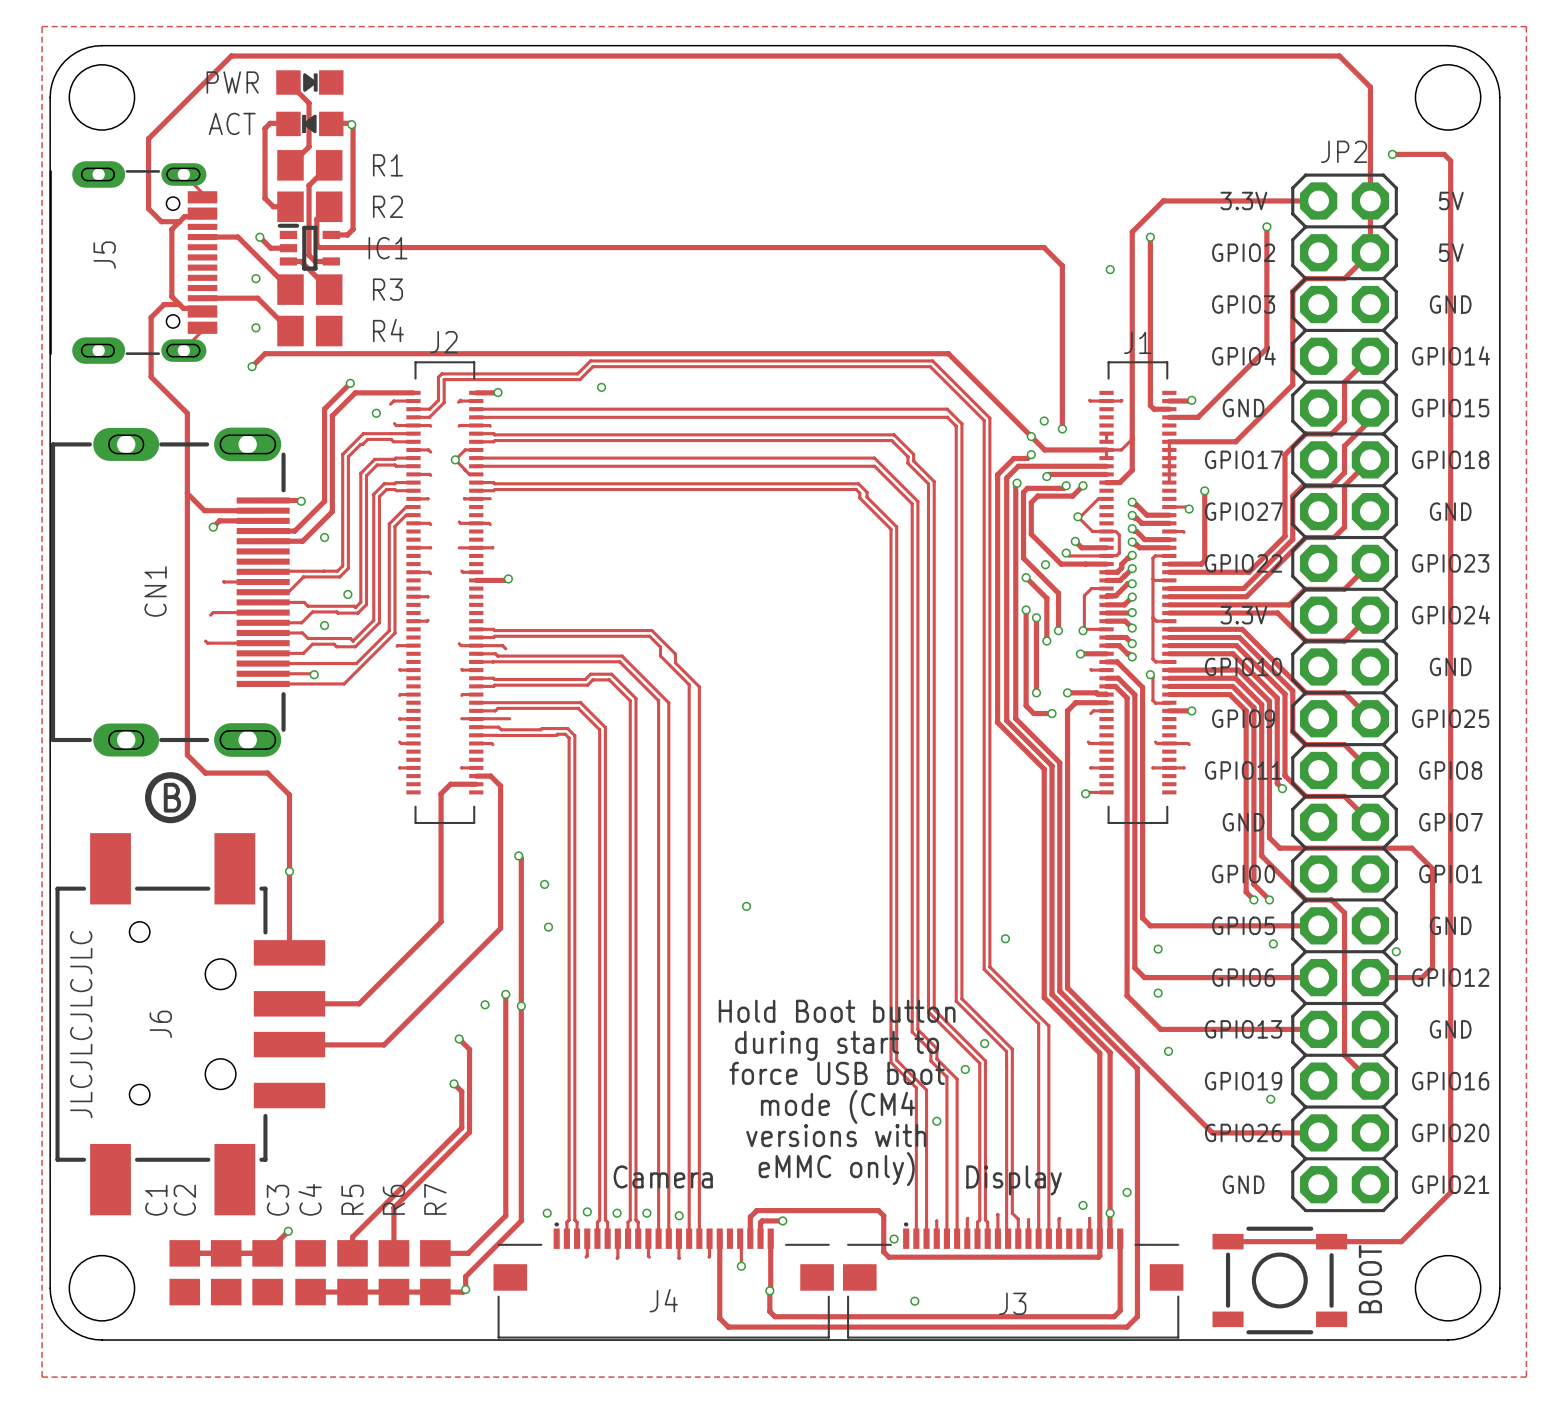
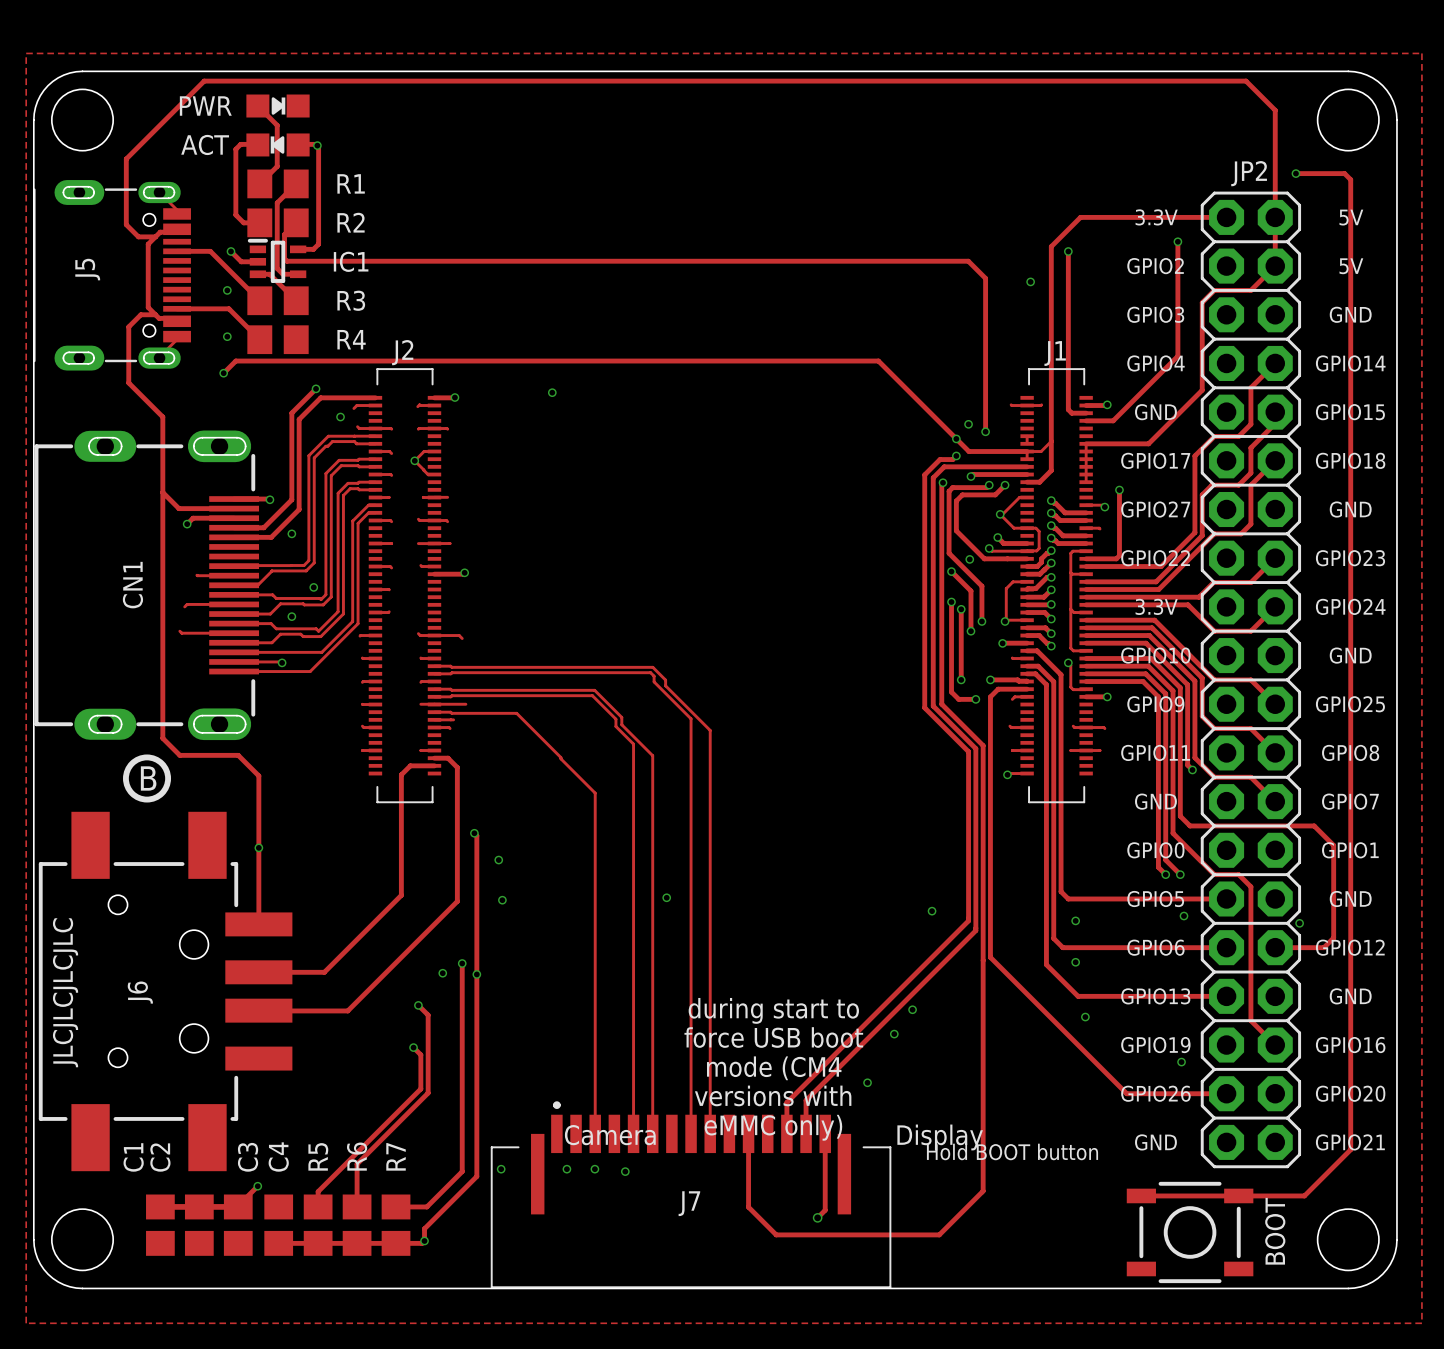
track: (413, 409) (429, 409) (438, 400) (438, 377) (441, 373) (577, 373) (590, 360) (932, 360) (989, 418) (989, 966) (1048, 1025) (1048, 1238) -> none
track: (476, 409) (947, 409) (961, 423) (961, 998) (1012, 1049) (1012, 1213) (1018, 1219) (1018, 1238) -> none
track: (413, 417) (429, 417) (444, 402) (444, 379) (579, 379) (592, 366) (930, 366) (984, 420) (984, 969) (1038, 1023) (1038, 1238) -> none
track: (476, 417) (947, 417) (956, 426) (956, 1001) (1006, 1051) (1008, 1238) -> none
track: (476, 433) (894, 434) (913, 454) (913, 461) (934, 481) (934, 1009) (985, 1060) (985, 1220) (987, 1222) (987, 1238) -> none
track: (476, 441) (891, 440) (907, 456) (907, 463) (928, 483) (928, 1012) (979, 1063) (979, 1220) (977, 1222) (977, 1238) -> none
track: (476, 458) (874, 458) (917, 501) (917, 1029) (936, 1048) (936, 1059) (957, 1079) (957, 1238) -> none
track: (476, 466) (874, 466) (912, 503) (912, 1032) (930, 1050) (930, 1061) (946, 1077) (946, 1238) -> none
track: (476, 482) (858, 483) (867, 492) (867, 497) (896, 526) (896, 1060) (926, 1090) (926, 1238) -> none
track: (476, 490) (856, 489) (859, 493) (859, 498) (890, 529) (890, 1062) (916, 1087) (916, 1238) -> none
track: (476, 629) (651, 630) (675, 654) (675, 662) (699, 686) (699, 1238) -> none
track: (476, 637) (649, 636) (660, 647) (660, 655) (689, 684) (689, 1238) -> none
track: (476, 653) (495, 653) (497, 656) (622, 656) (668, 702) (668, 1238) -> none
track: (476, 661) (619, 661) (658, 700) (658, 1238) -> none
track: (585, 679) (590, 674) (611, 674) (635, 698) (635, 1220) (638, 1222) (638, 1238) -> (537, 667) (652, 667) (665, 680) (665, 685) (710, 730) (710, 1133)
track: (587, 685) (592, 679) (609, 679) (630, 700) (630, 1220) (628, 1222) (628, 1238) -> (539, 672) (650, 672) (654, 676) (654, 681) (691, 718) (691, 1133)
track: (493, 702) (580, 702) (605, 727) (605, 1220) (607, 1222) (607, 1238) -> (450, 689) (594, 690) (621, 717) (621, 724) (652, 755) (652, 1133)
track: (493, 710) (497, 708) (578, 708) (599, 729) (599, 1220) (597, 1222) (597, 1238) -> (450, 696) (592, 695) (615, 719) (615, 726) (633, 744) (633, 1133)
track: (493, 727) (498, 727) (501, 729) (567, 728) (574, 735) (574, 1220) (577, 1222) (577, 1238) -> (450, 712) (516, 713) (595, 793) (595, 1133)
track: (496, 735) (565, 734) (569, 738) (569, 1220) (566, 1222) (566, 1238) -> none
via position: (746, 906) -> (666, 897)
track: (1044, 949) (1044, 997) (1099, 1053) (1098, 1257) (888, 1257) (883, 1252) (883, 1215) (878, 1210) (756, 1210) (750, 1217) (750, 1238) -> (968, 920) (786, 1102) (786, 1133)
track: (1052, 959) (1052, 994) (1110, 1052) (1110, 1213) -> (975, 930) (806, 1100) (806, 1133)
track: (1059, 991) (1137, 1068) (1137, 1316) (1127, 1327) (728, 1327) (719, 1318) (719, 1238) -> (983, 960) (983, 1191) (939, 1234) (776, 1234) (748, 1207) (748, 1133)
text: Hold Boot button (837, 1011) -> none
track: none -> (825, 1133) (825, 1210) (817, 1217)
via: (1127, 1192) -> none
text: none -> Hold BOOT button (1012, 1151)
via: (1083, 1205) -> none
via: (587, 1211) -> none
track: (1110, 1213) (1110, 1238) -> none
via: (1110, 1213) -> none
track: (997, 1214) (997, 1238) -> none
track: (967, 1218) (967, 1238) -> none
track: (1089, 1218) (1089, 1238) -> none
track: (1028, 1219) (1028, 1238) -> none
track: (782, 1220) (762, 1220) (760, 1238) -> none
via: (782, 1220) -> none
track: (936, 1221) (936, 1238) -> none
track: (587, 1238) (586, 1257) -> none
track: (617, 1238) (617, 1258) -> none
track: (648, 1238) (649, 1257) -> none
track: (678, 1238) (678, 1258) -> none
track: (709, 1238) (709, 1257) -> none
track: (740, 1238) (741, 1266) -> none
track: (770, 1238) (769, 1311) (775, 1316) (1114, 1316) (1120, 1310) (1120, 1238) -> none
via: (894, 1239) -> none
J7: none -> (691, 1194)
via: none -> (817, 1217)
via: (741, 1266) -> none
J4: (663, 1280) -> none
J3: (1013, 1280) -> none
via: (769, 1290) -> none
via: (914, 1301) -> none

